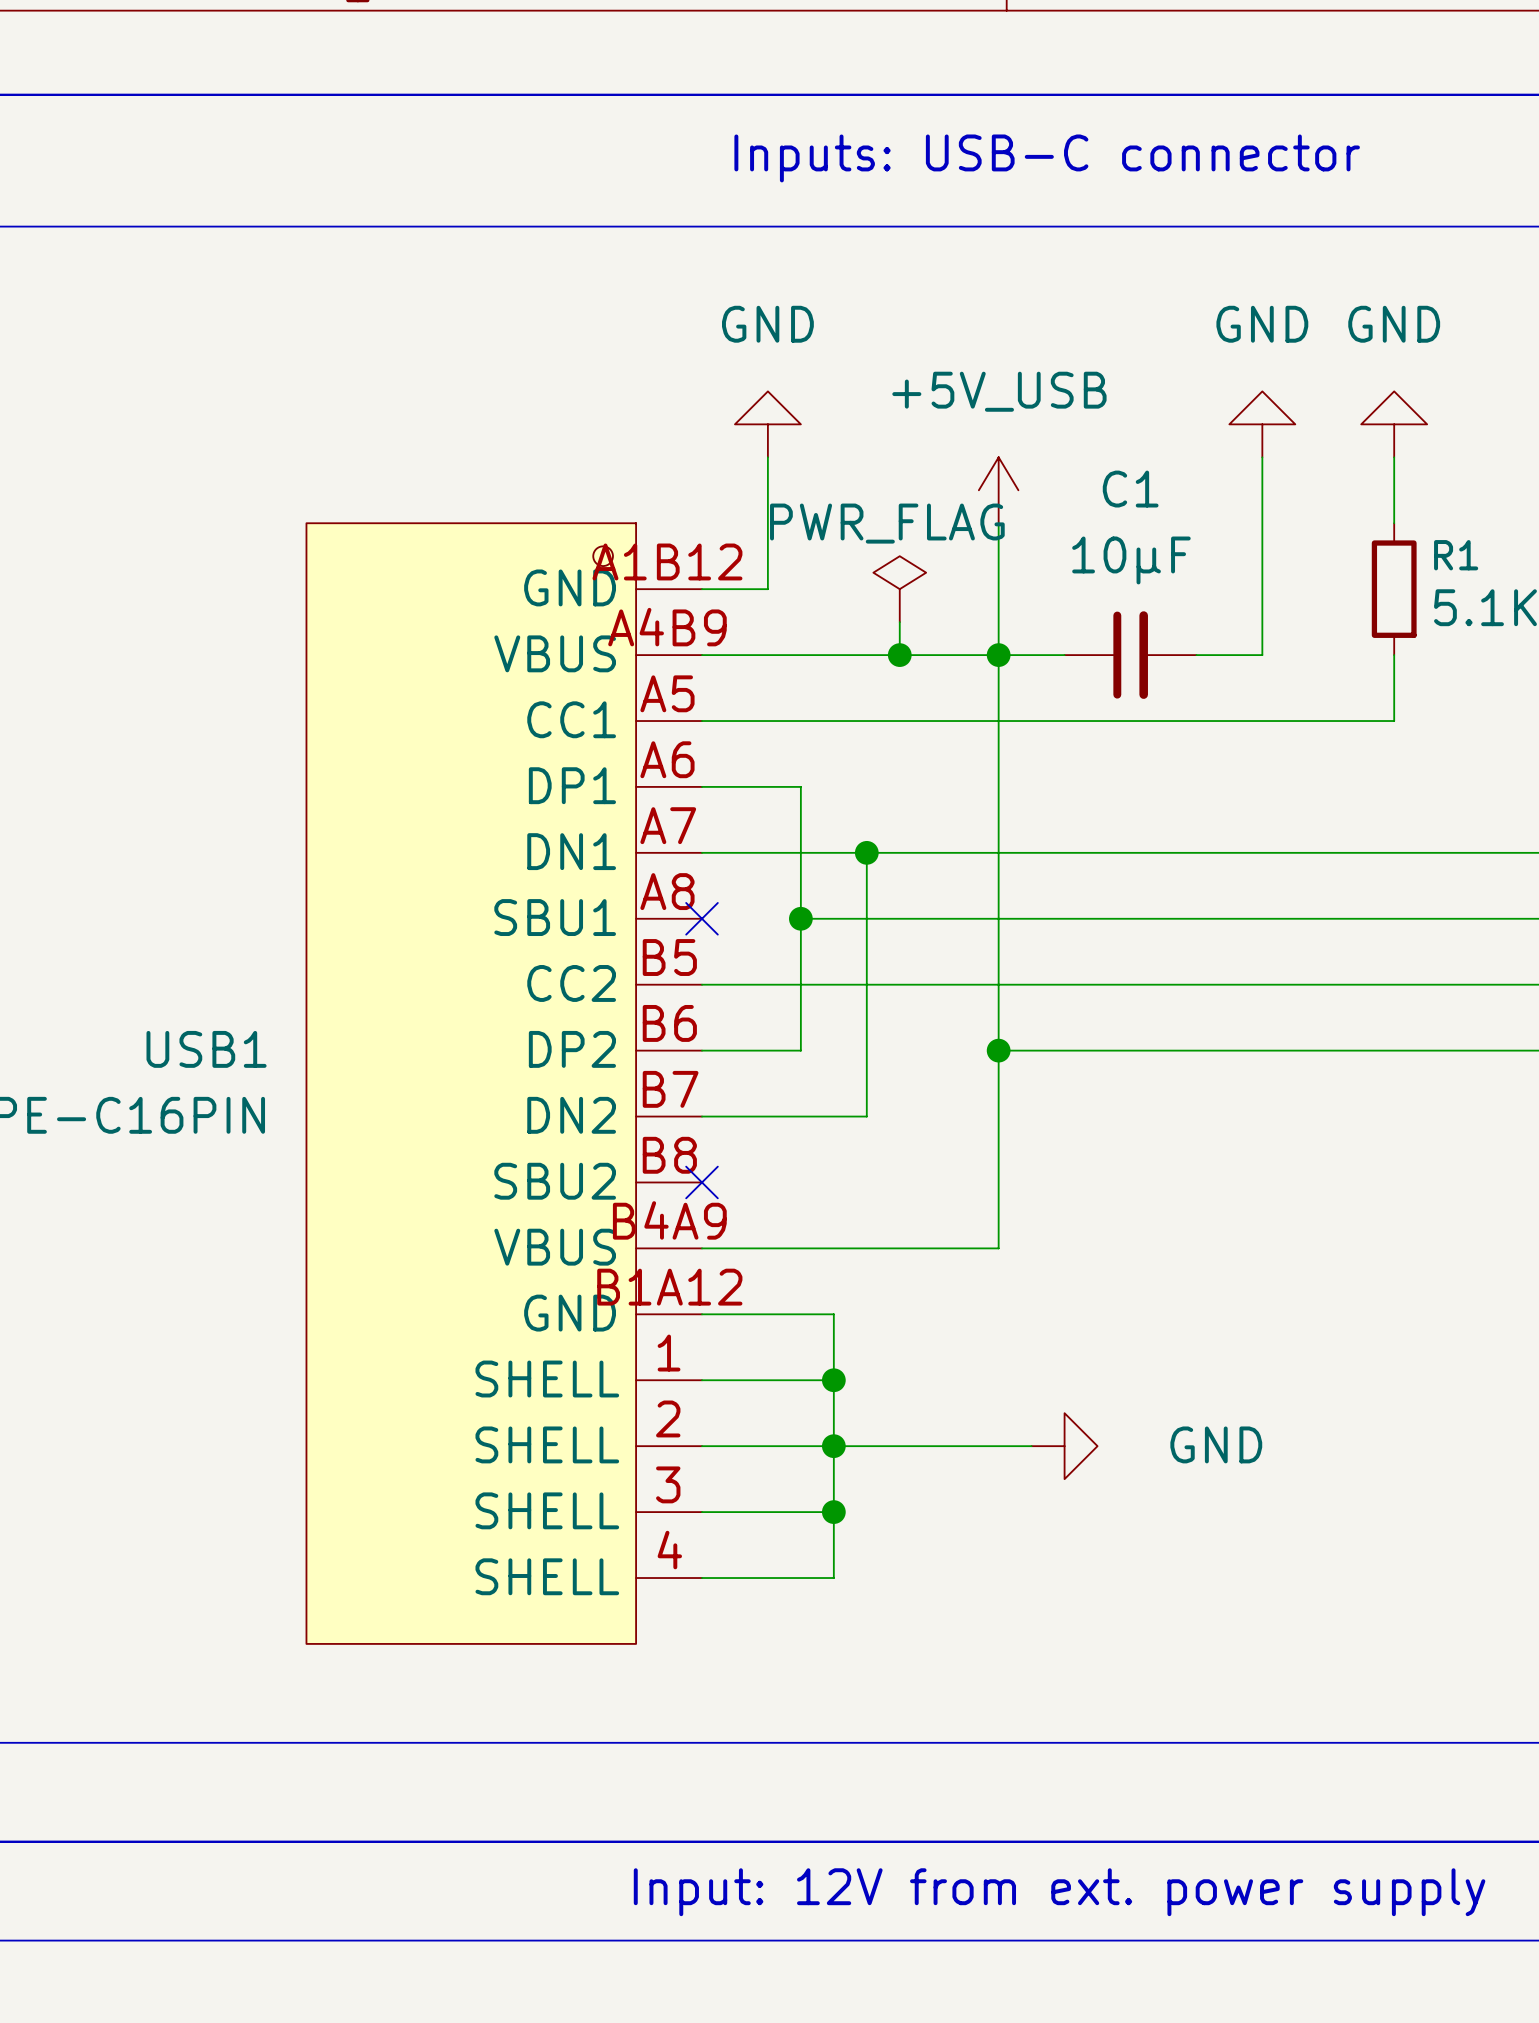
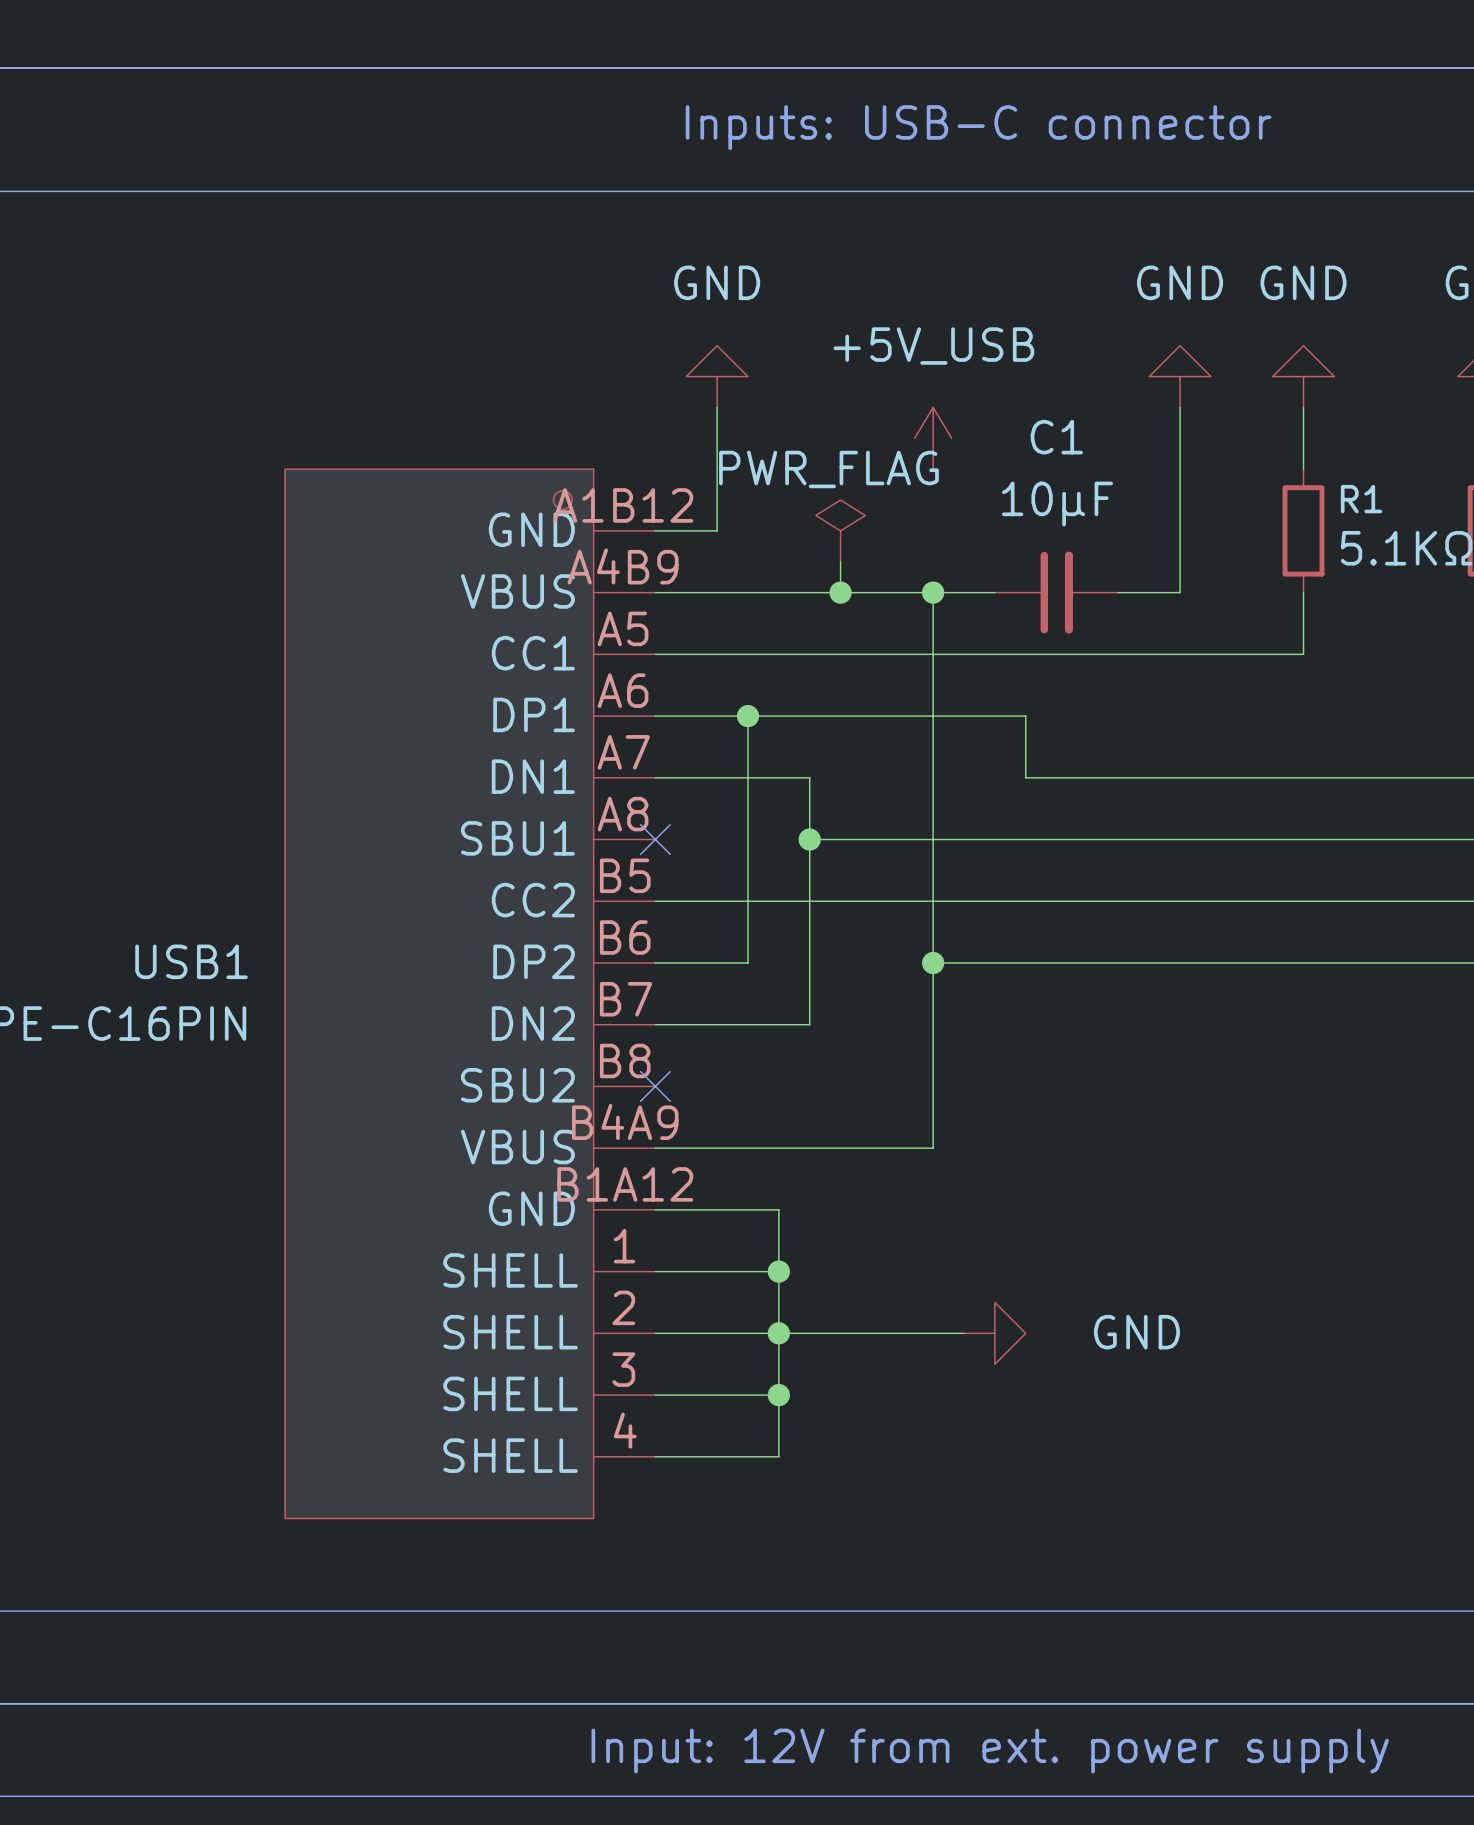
wire: (998, 523) (998, 655) -> none
junction: none -> (747, 716)
wire: (866, 852) (1097, 852) -> (747, 716) (1025, 716) (1025, 777)
junction: (866, 852) -> none
wire: (800, 918) (866, 918) -> none
junction: (800, 918) -> none
junction: none -> (809, 839)

